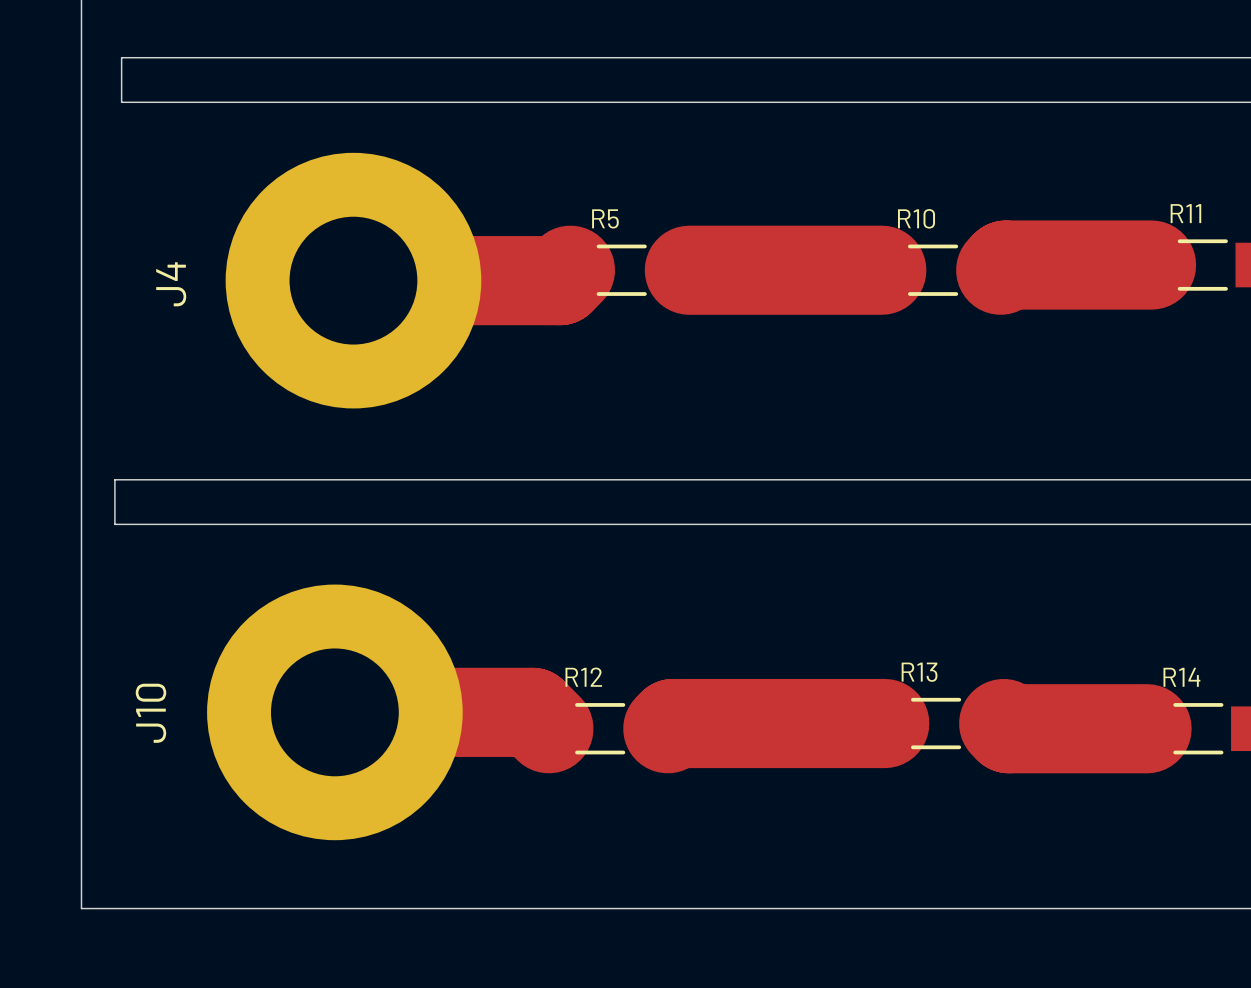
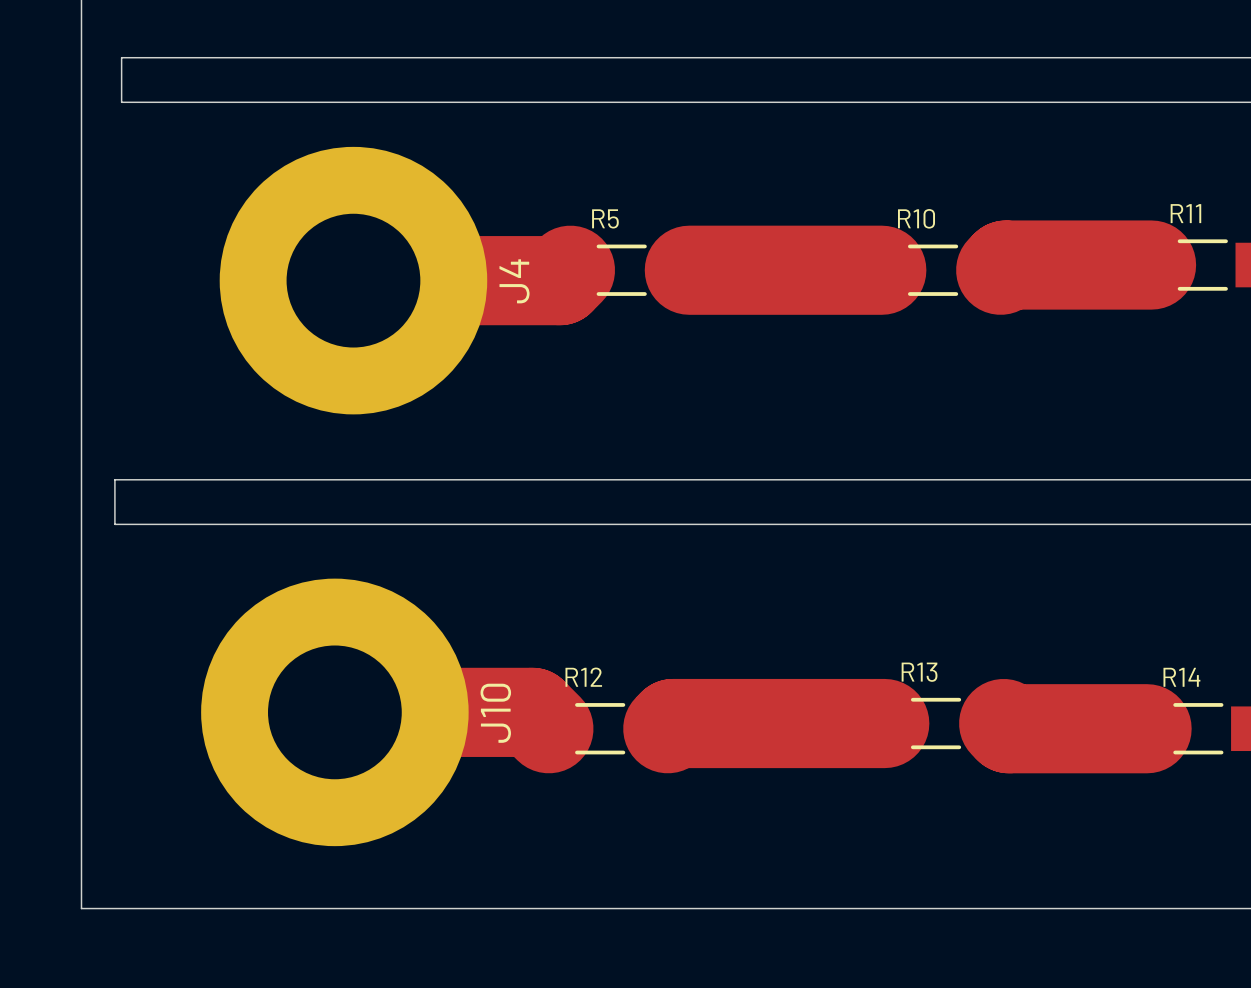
J4 footprint: [225, 152, 482, 409] -> [219, 146, 488, 415]
J4 name position: J4 (171, 284) -> J4 (514, 281)
J10 footprint: [207, 584, 463, 841] -> [201, 578, 469, 847]
J10 name position: J10 (150, 713) -> J10 (495, 713)

